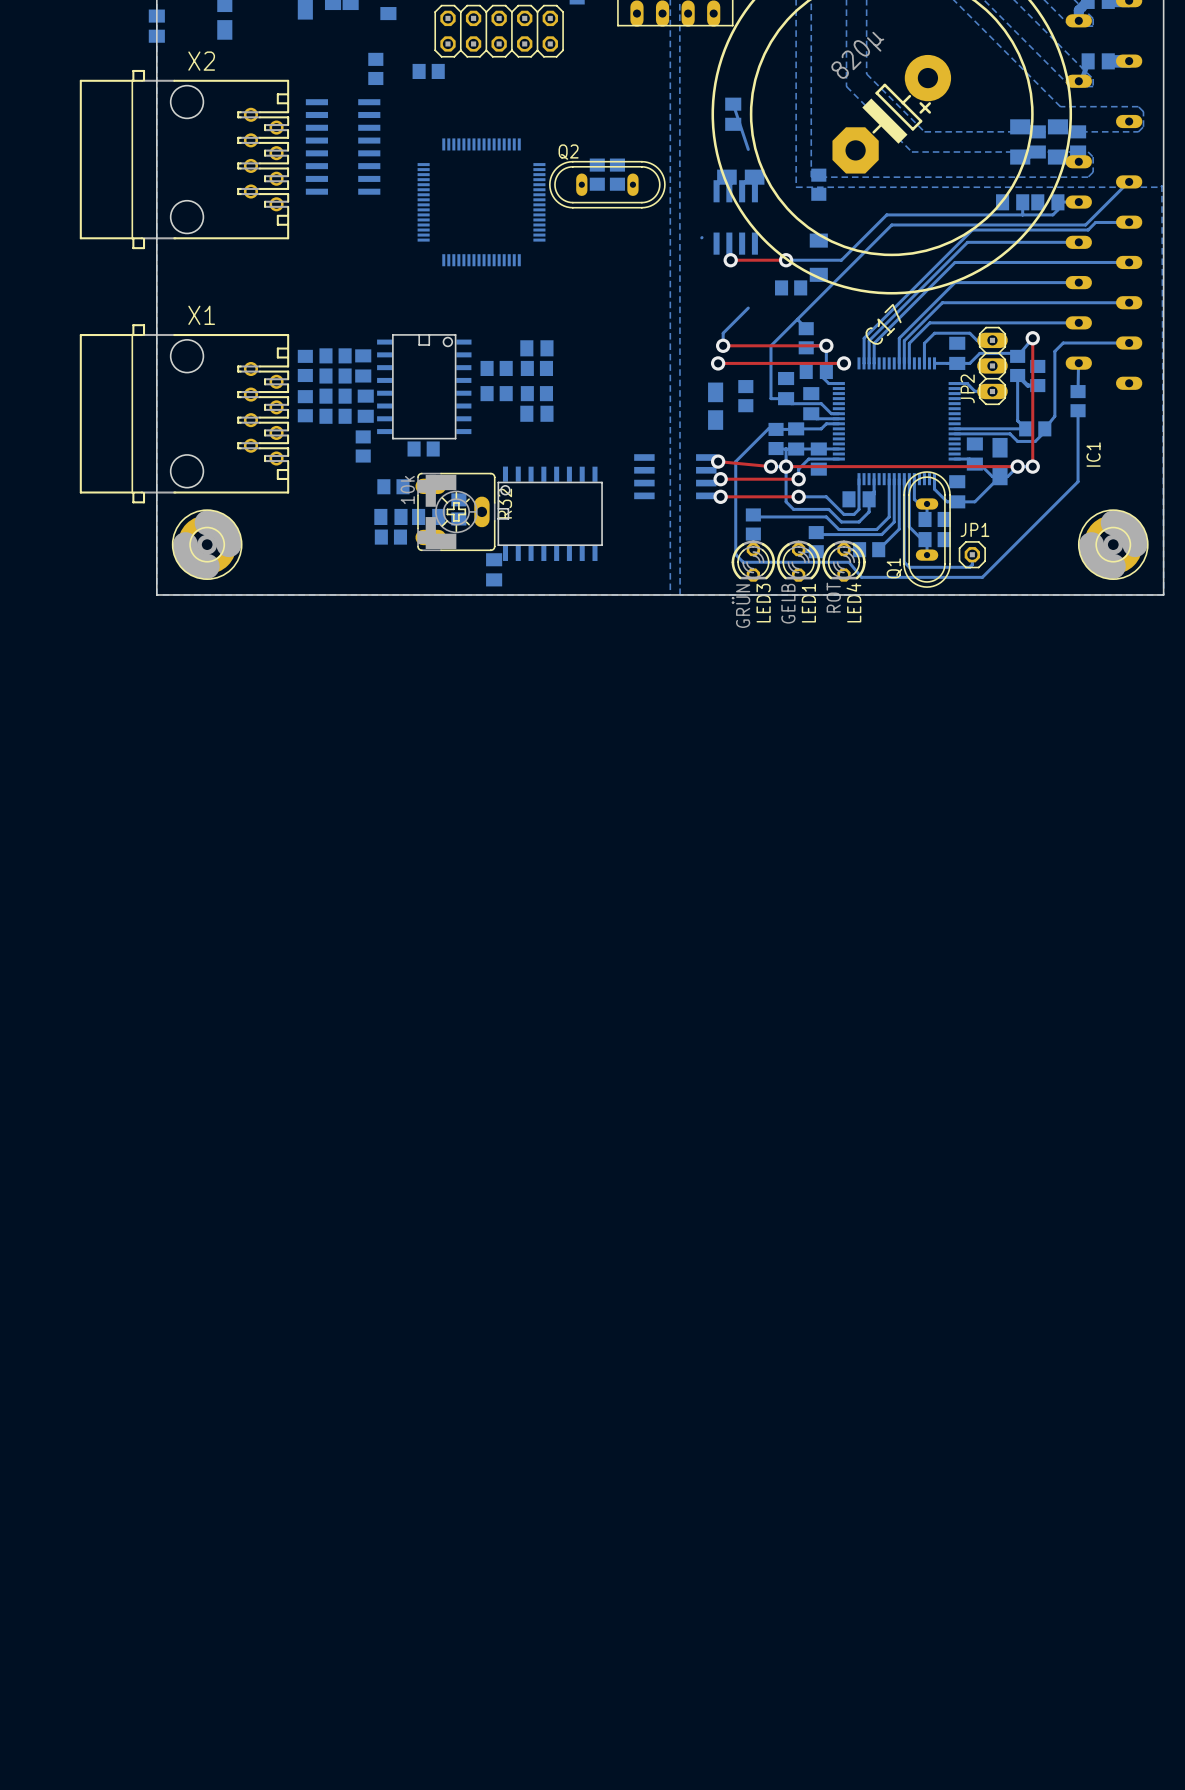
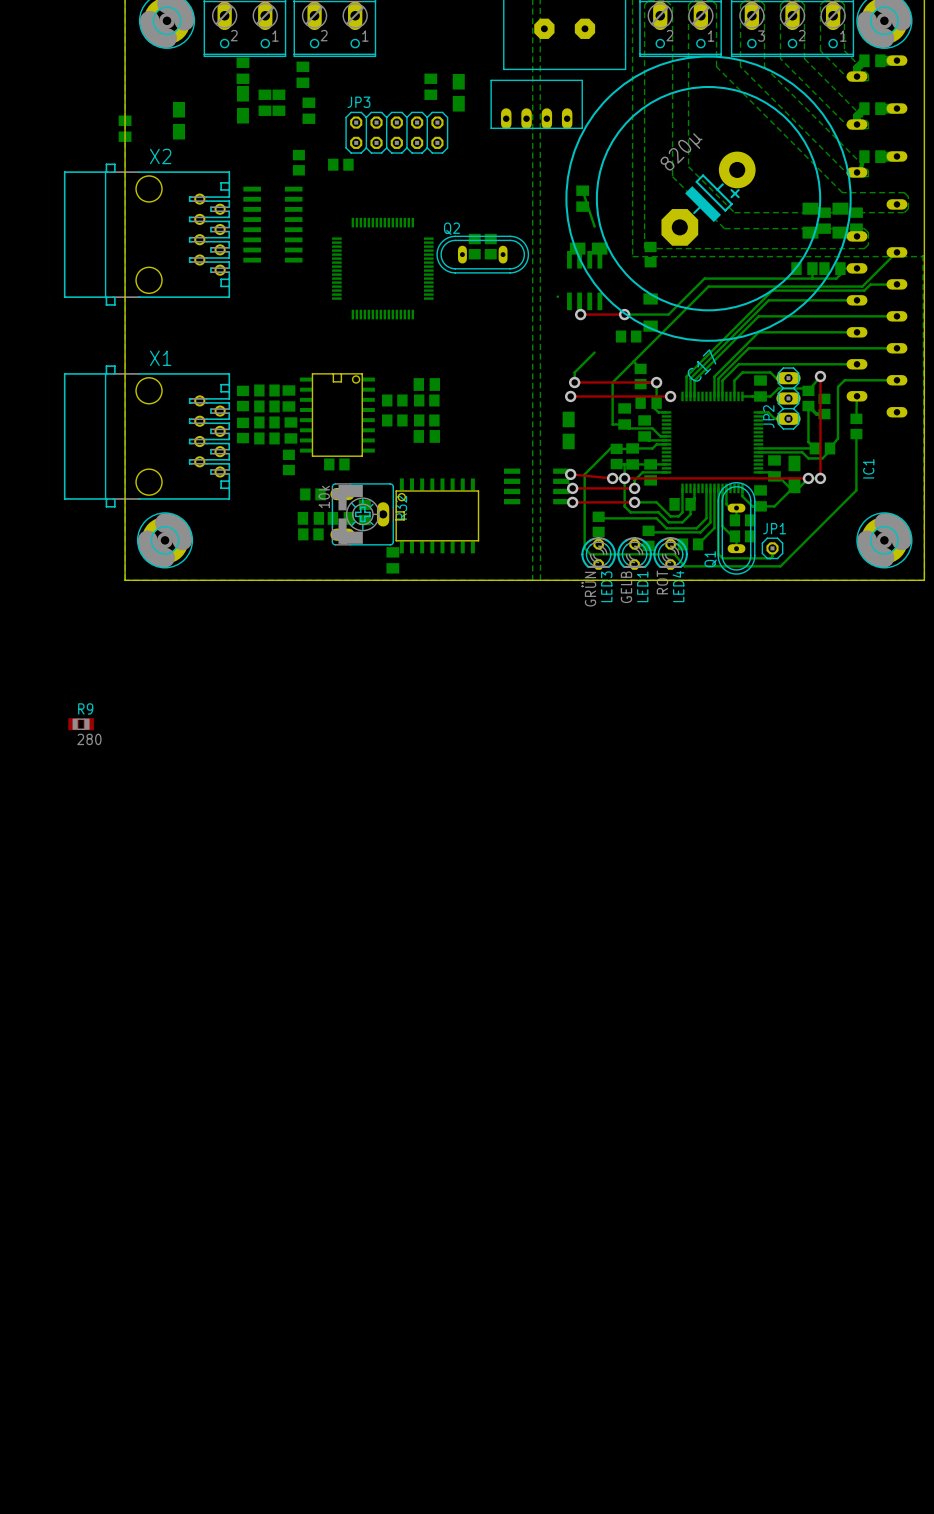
part: (745, 396) -> none
R9: none -> 280 (81, 724)

